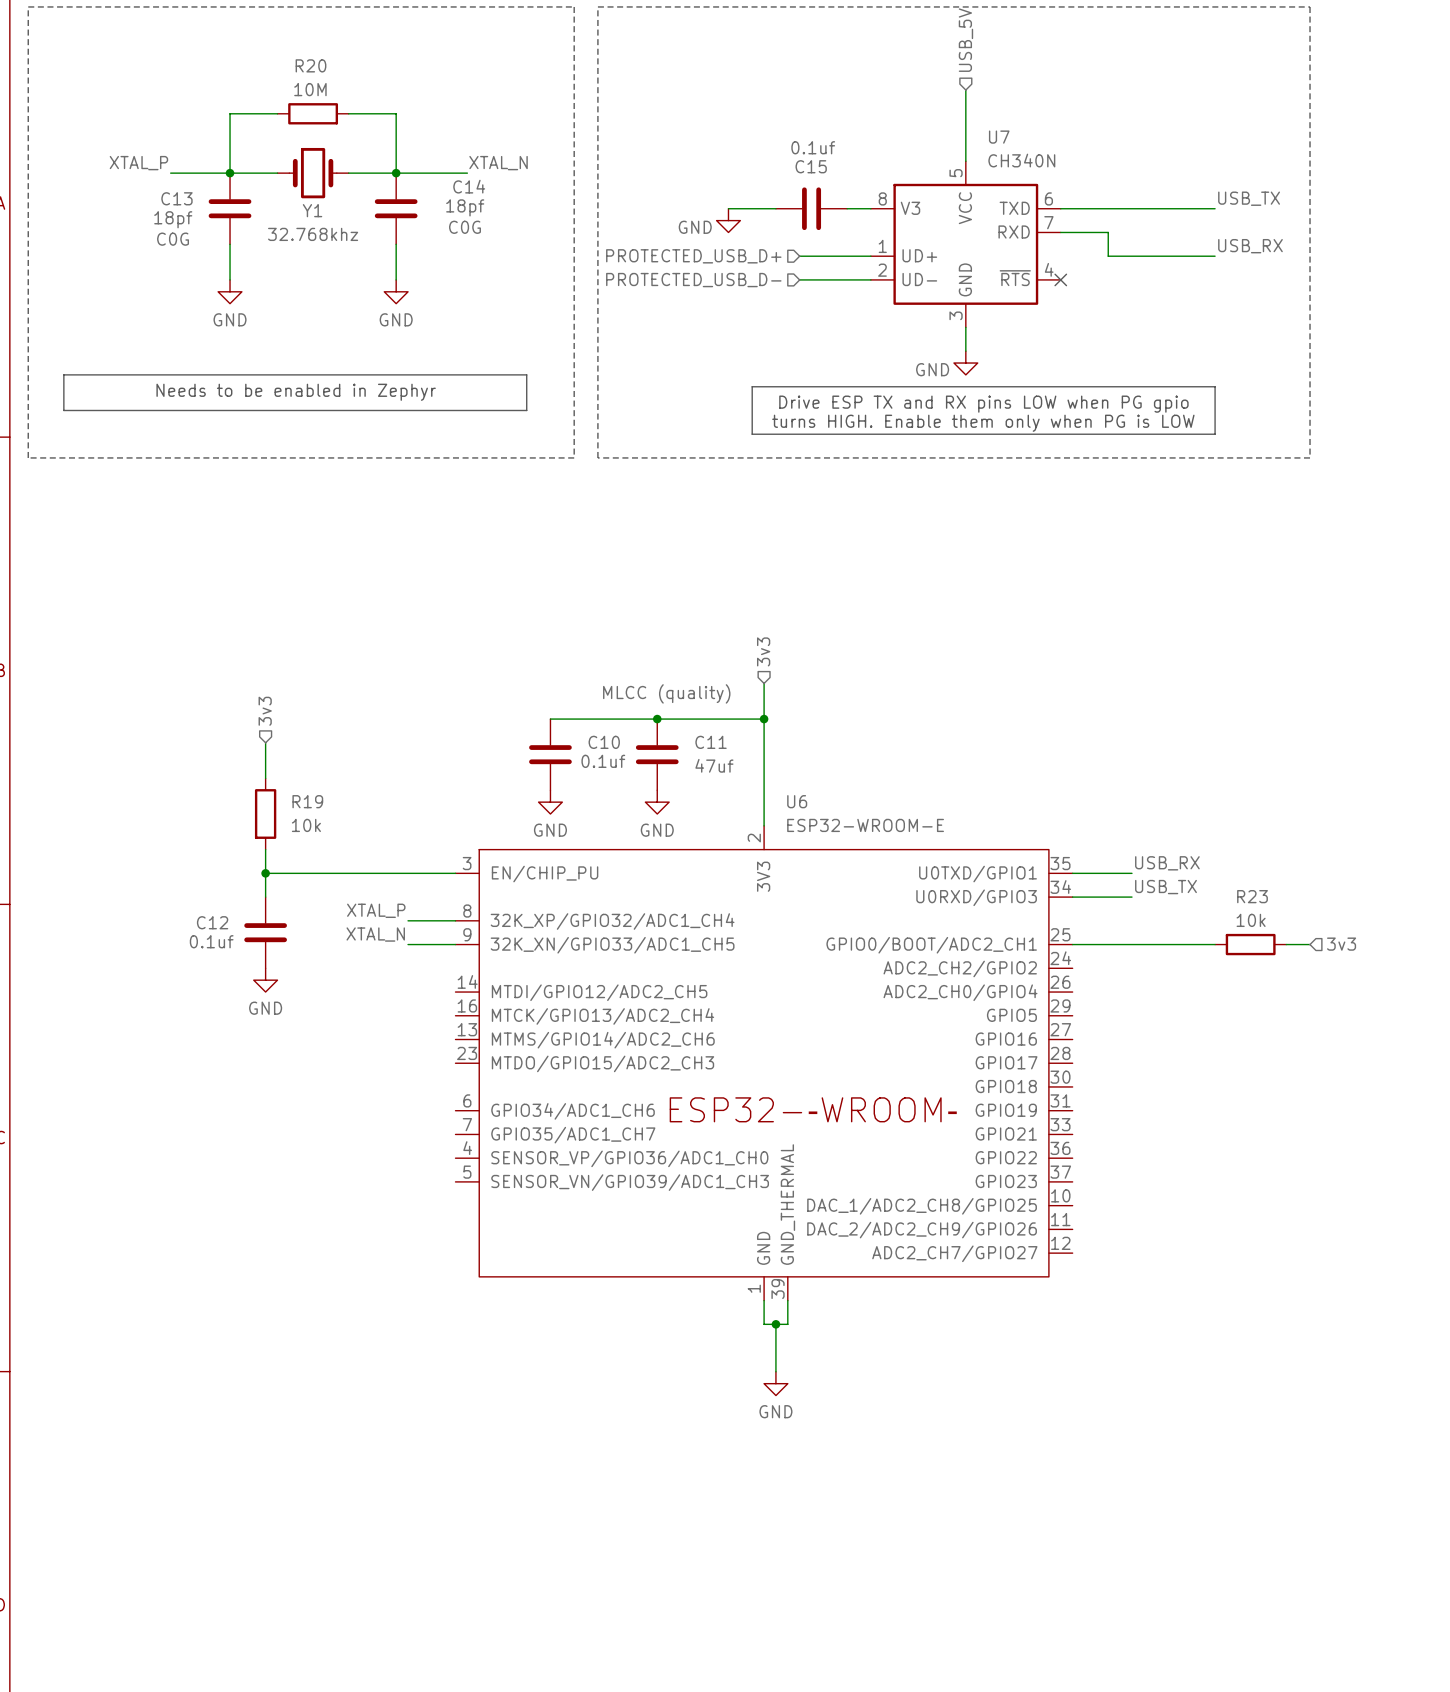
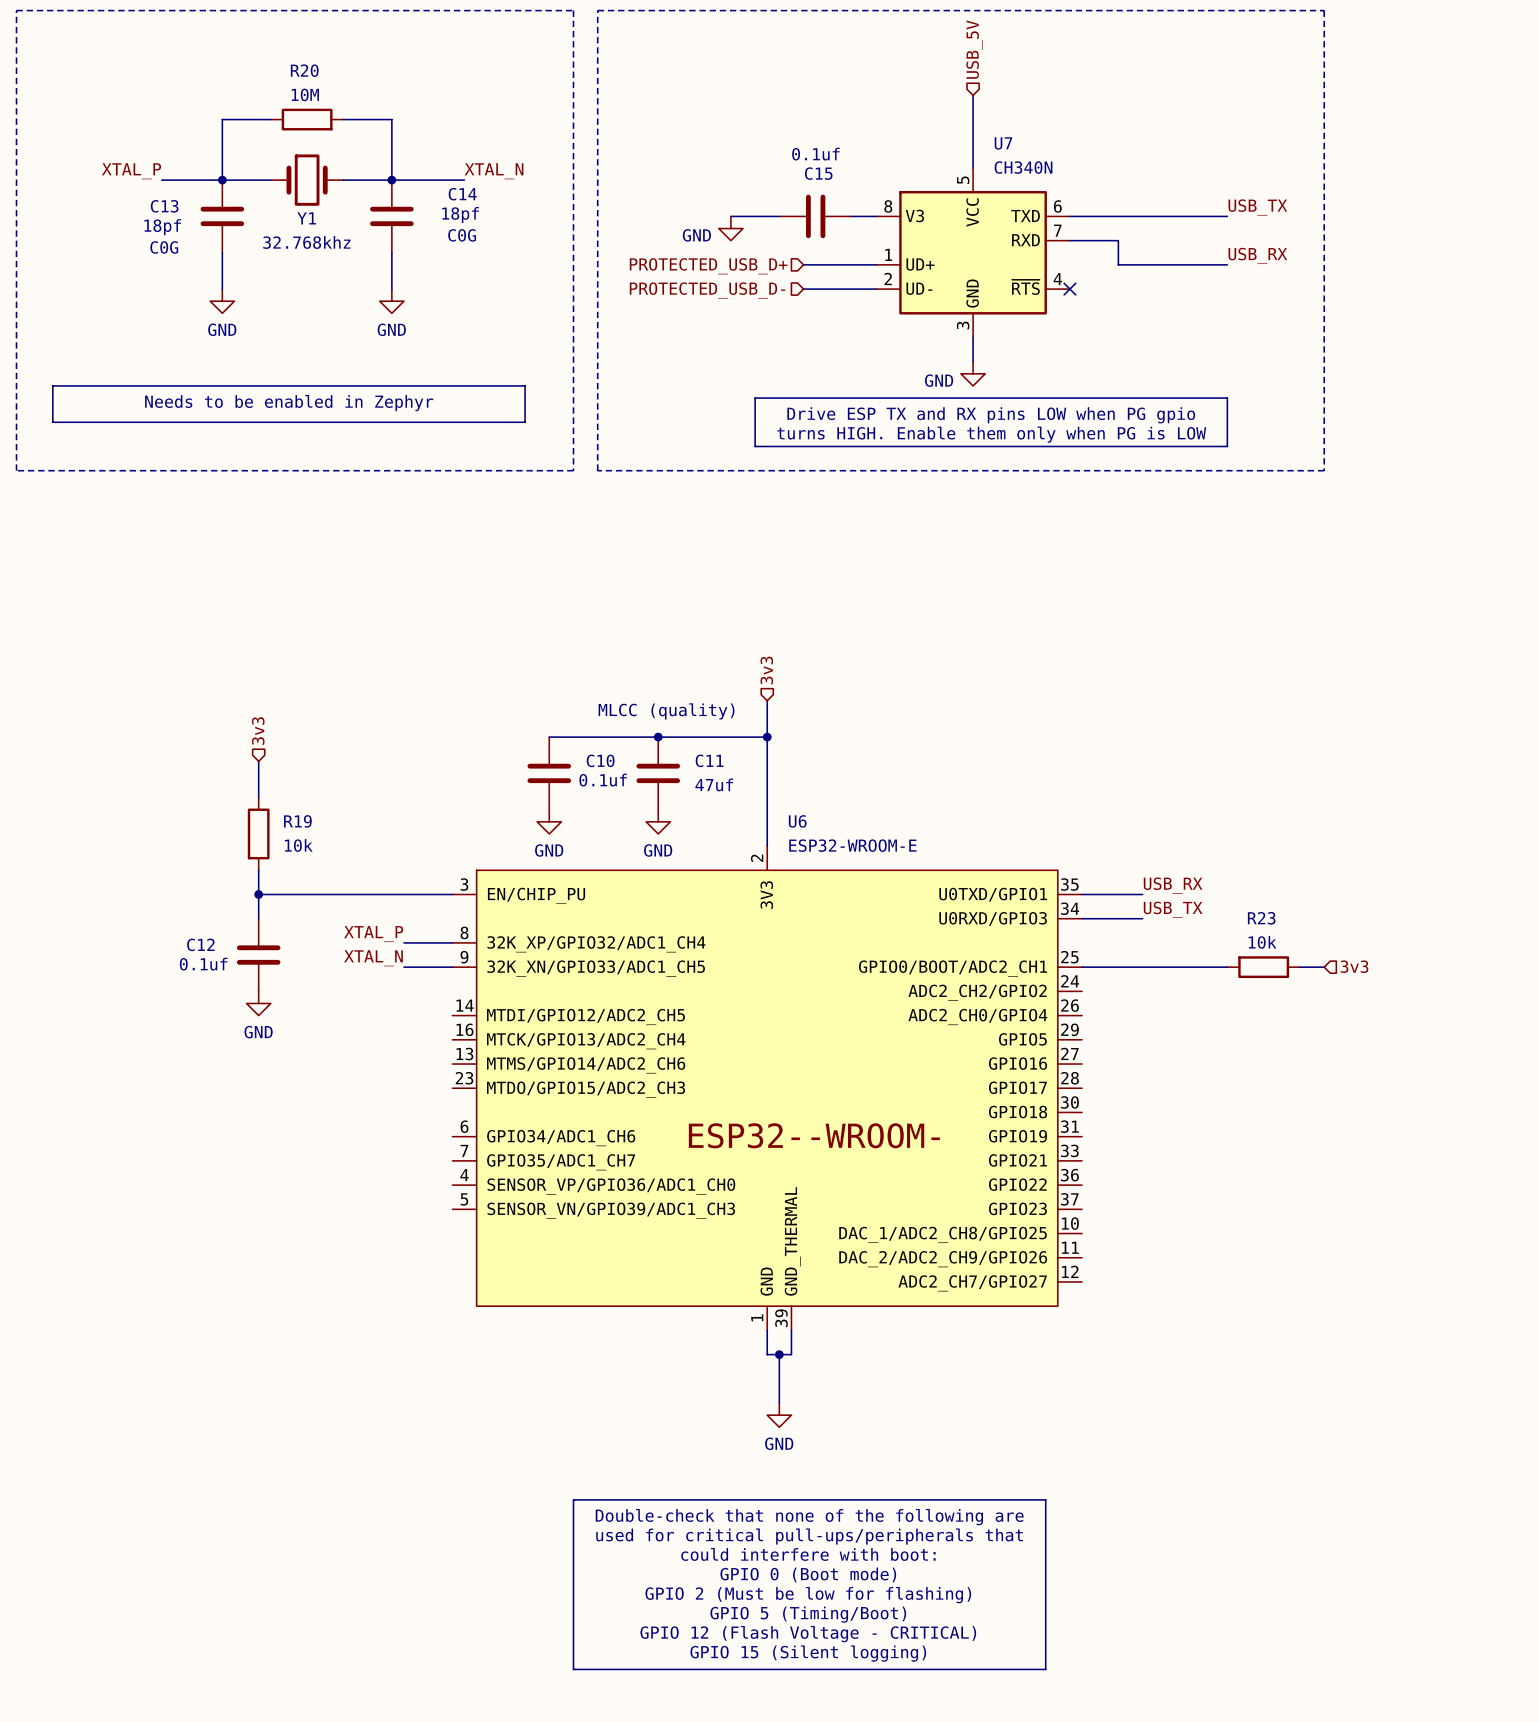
line: none -> (573, 1499) (1045, 1499) (1045, 1669) (573, 1669) (573, 1499)
text: none -> Double-check that none of the following are (809, 1517)
text: none -> used for critical pull-ups/peripherals that (809, 1536)
text: none -> could interfere with boot: (808, 1554)
text: none -> GPIO 0 (Boot mode) (808, 1574)
text: none -> GPIO 2 (Must be low for flashing) (808, 1595)
text: none -> GPIO 5 (Timing/Boot) (808, 1614)
text: none -> GPIO 12 (Flash Voltage - CRITICAL) (808, 1634)
text: none -> GPIO 15 (Silent logging) (808, 1653)

